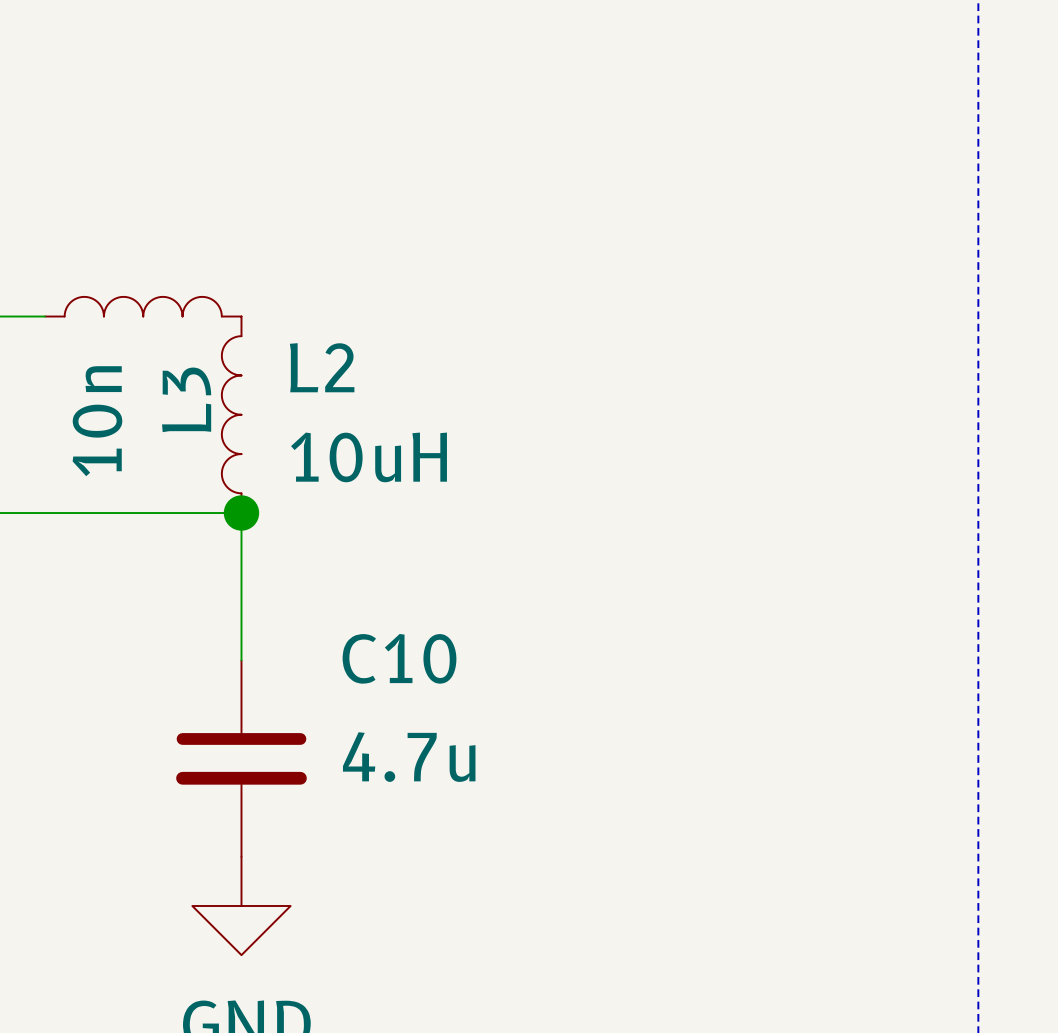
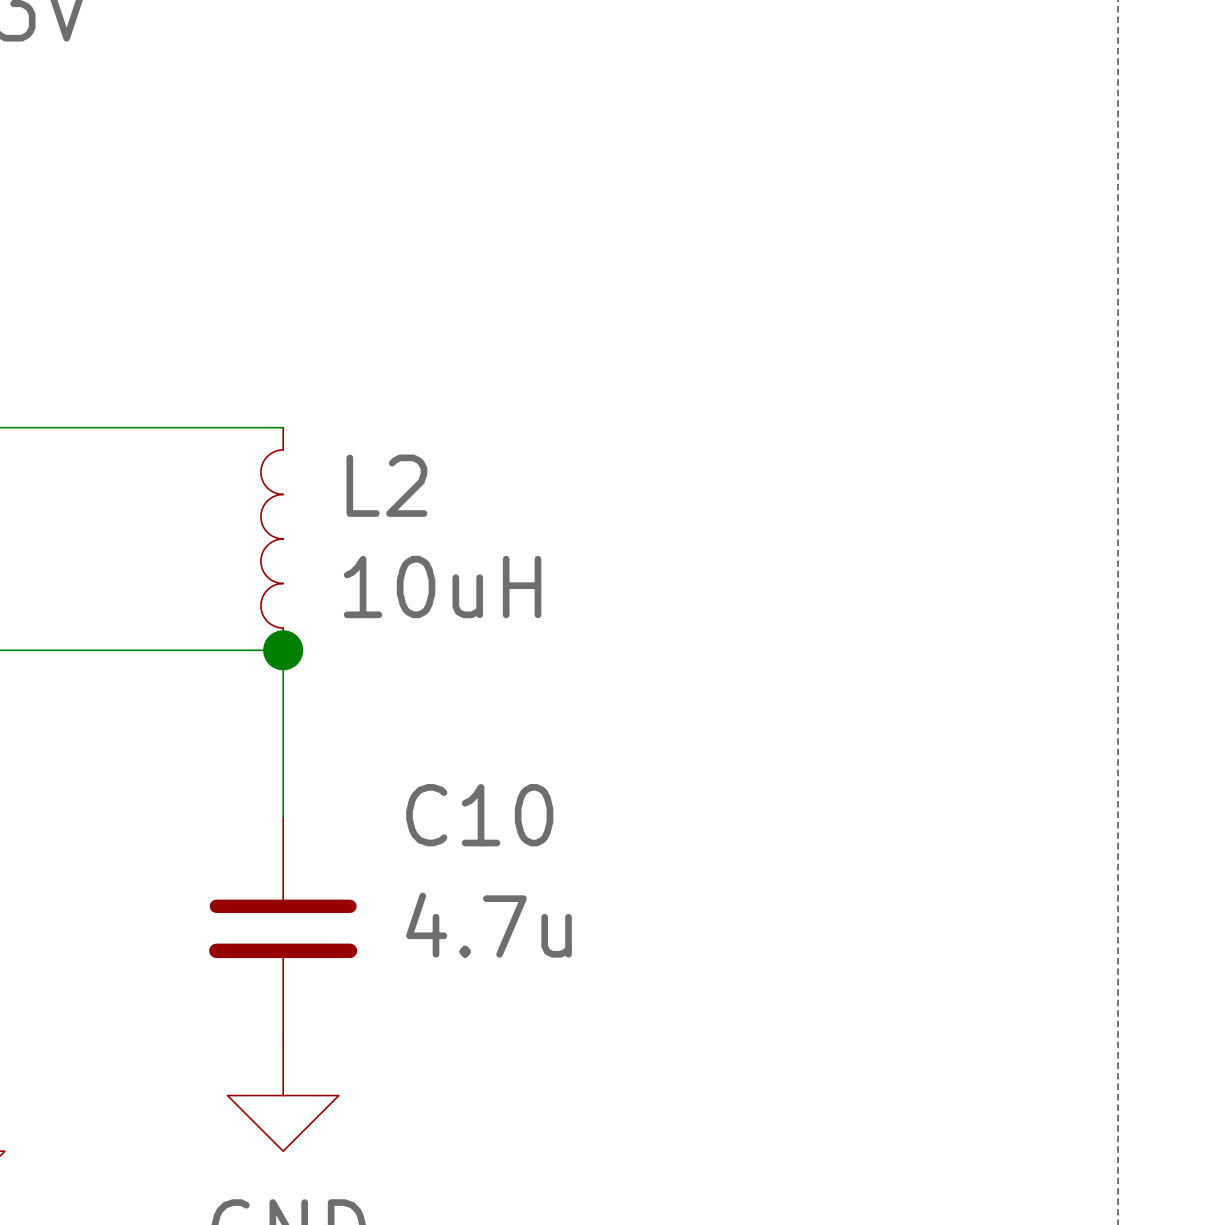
L3: 10n (143, 306) -> none
wire: none -> (60, 427) (283, 427)

